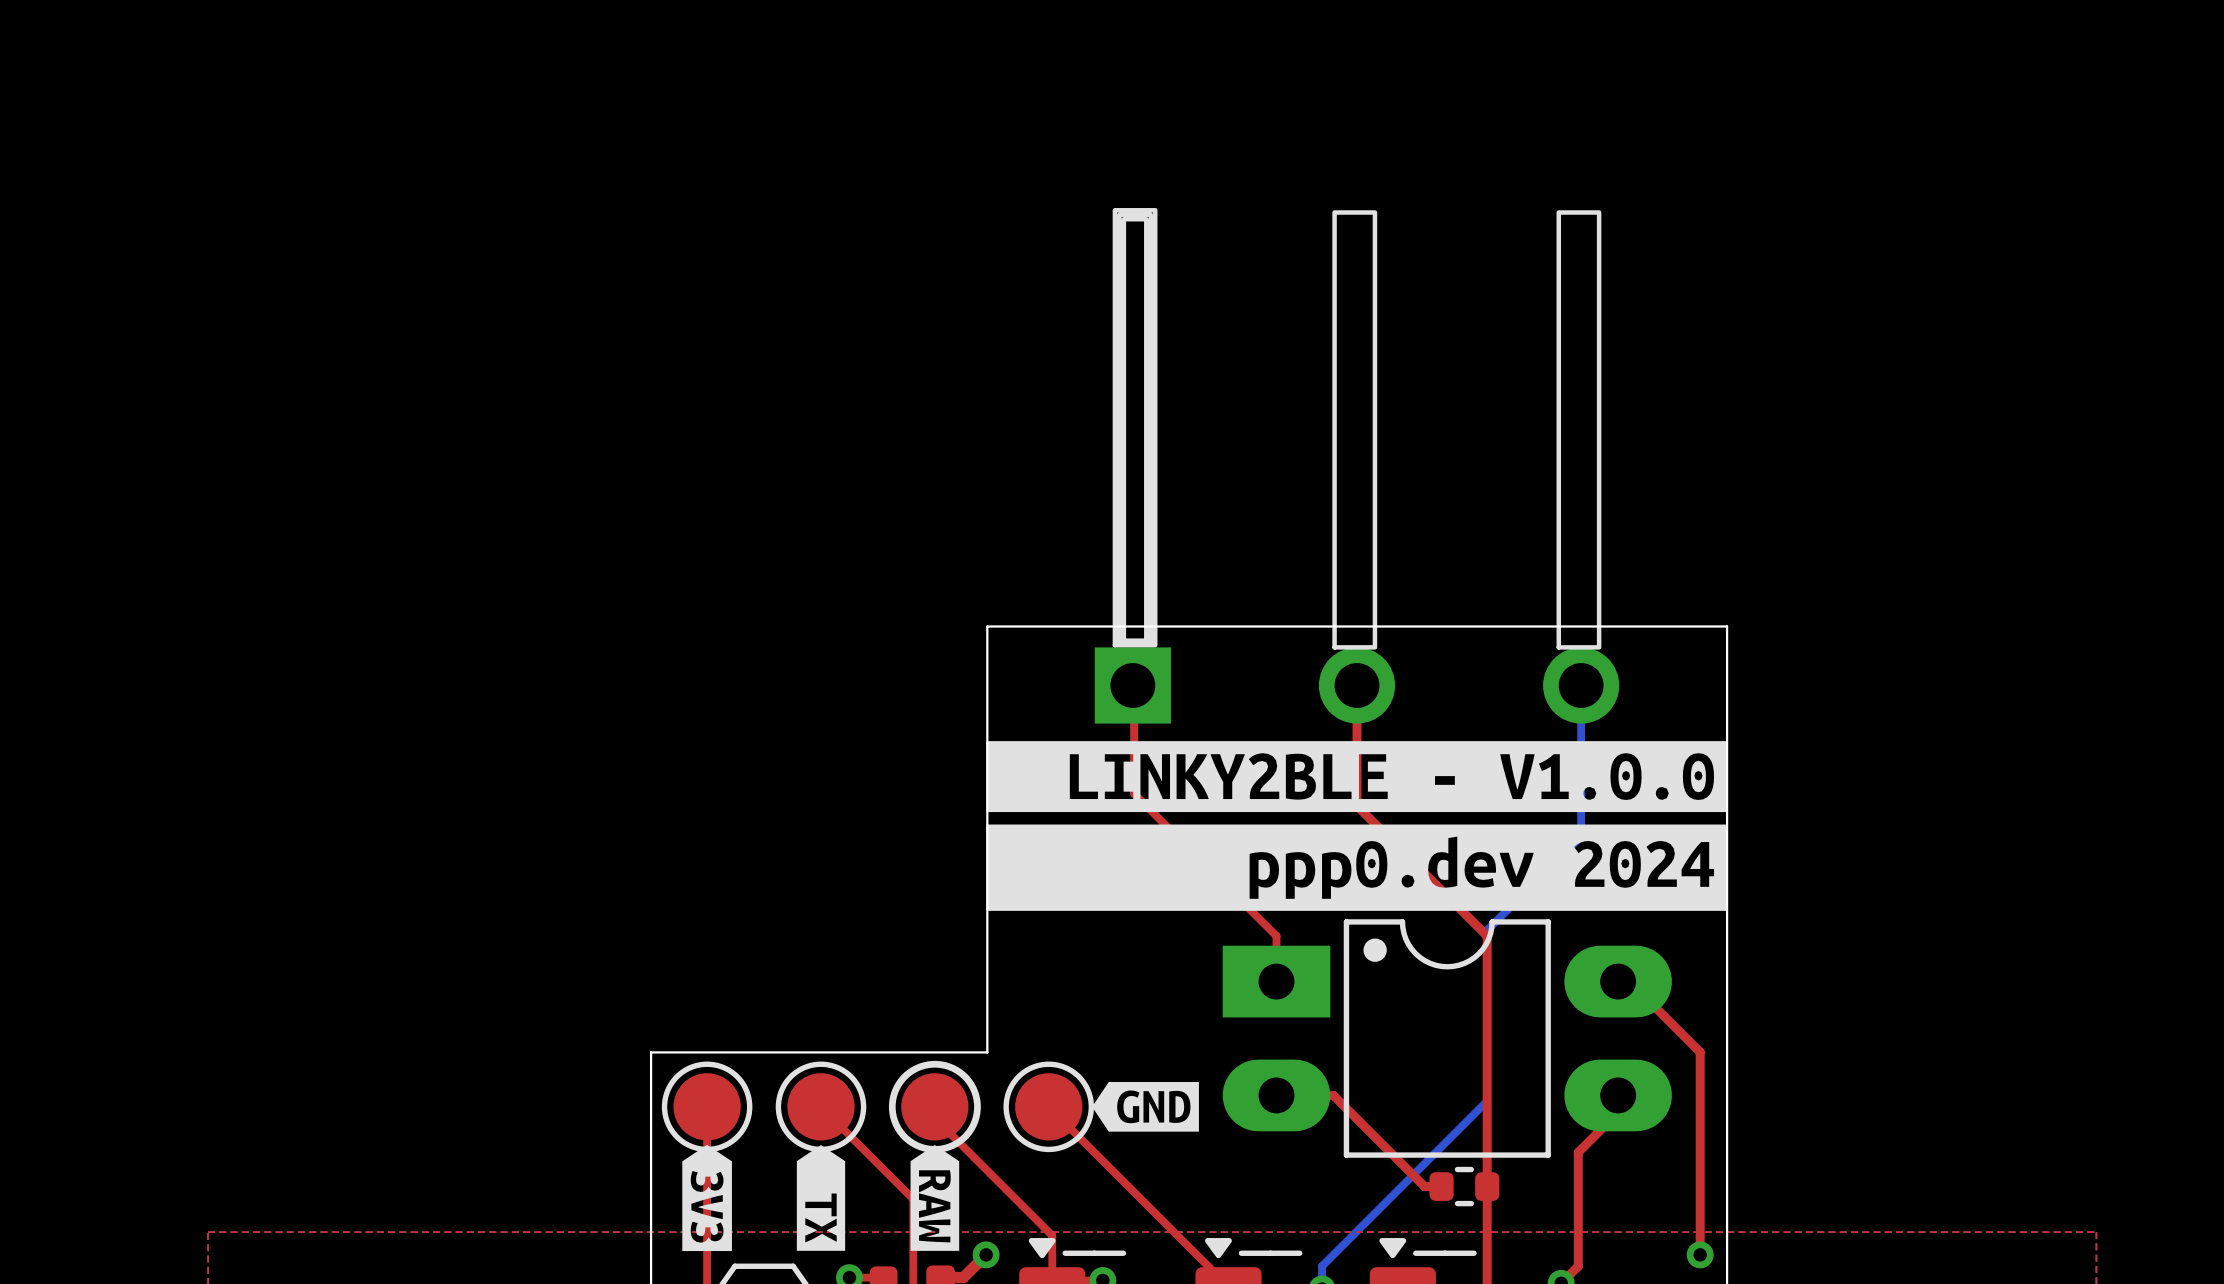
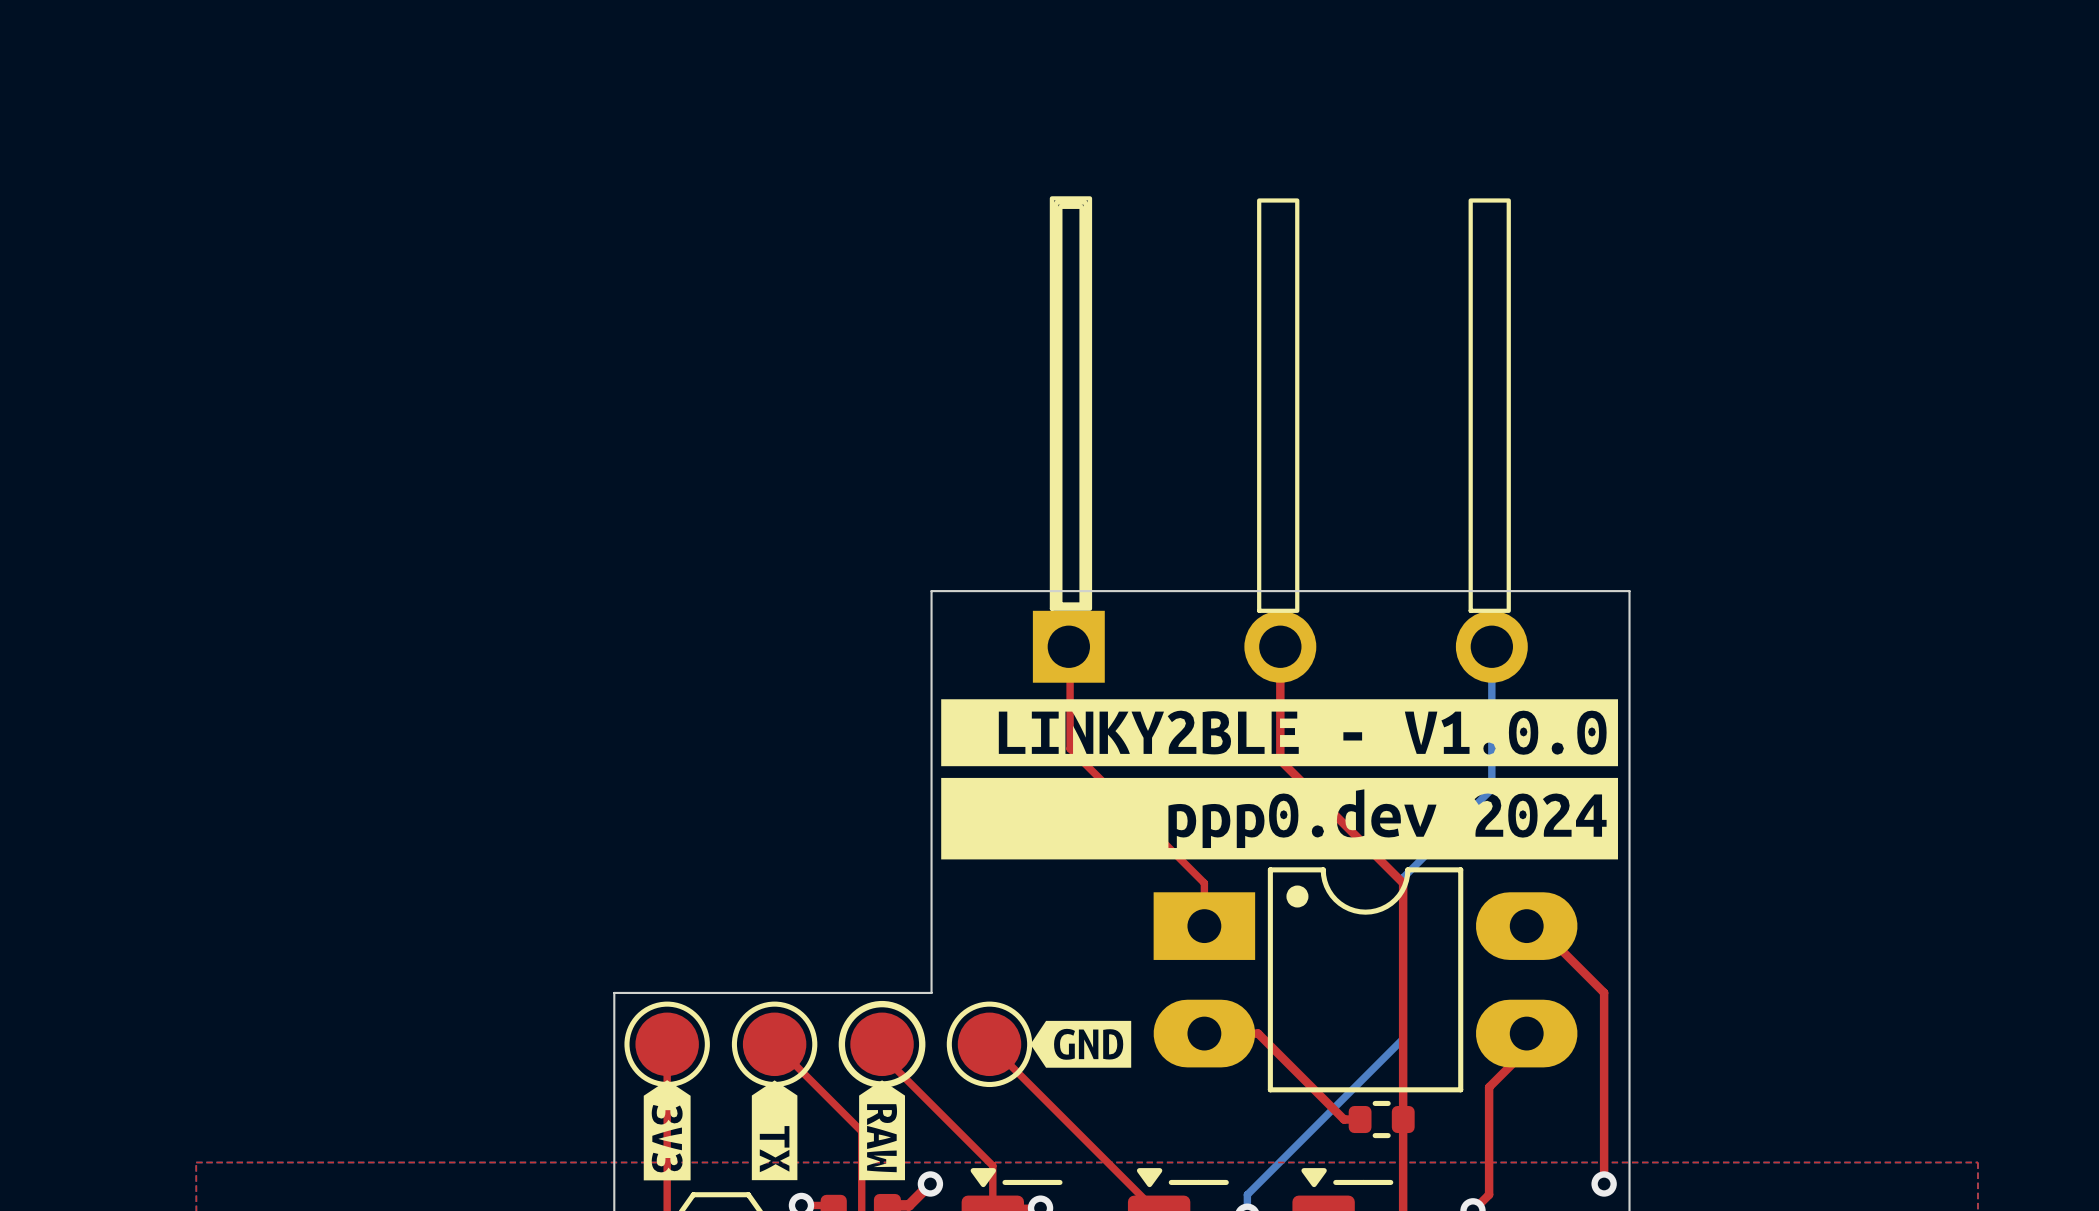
drawing shape: [986, 741, 1727, 813] -> [941, 699, 1619, 767]
drawing shape: [986, 824, 1727, 911] -> [941, 777, 1619, 860]

